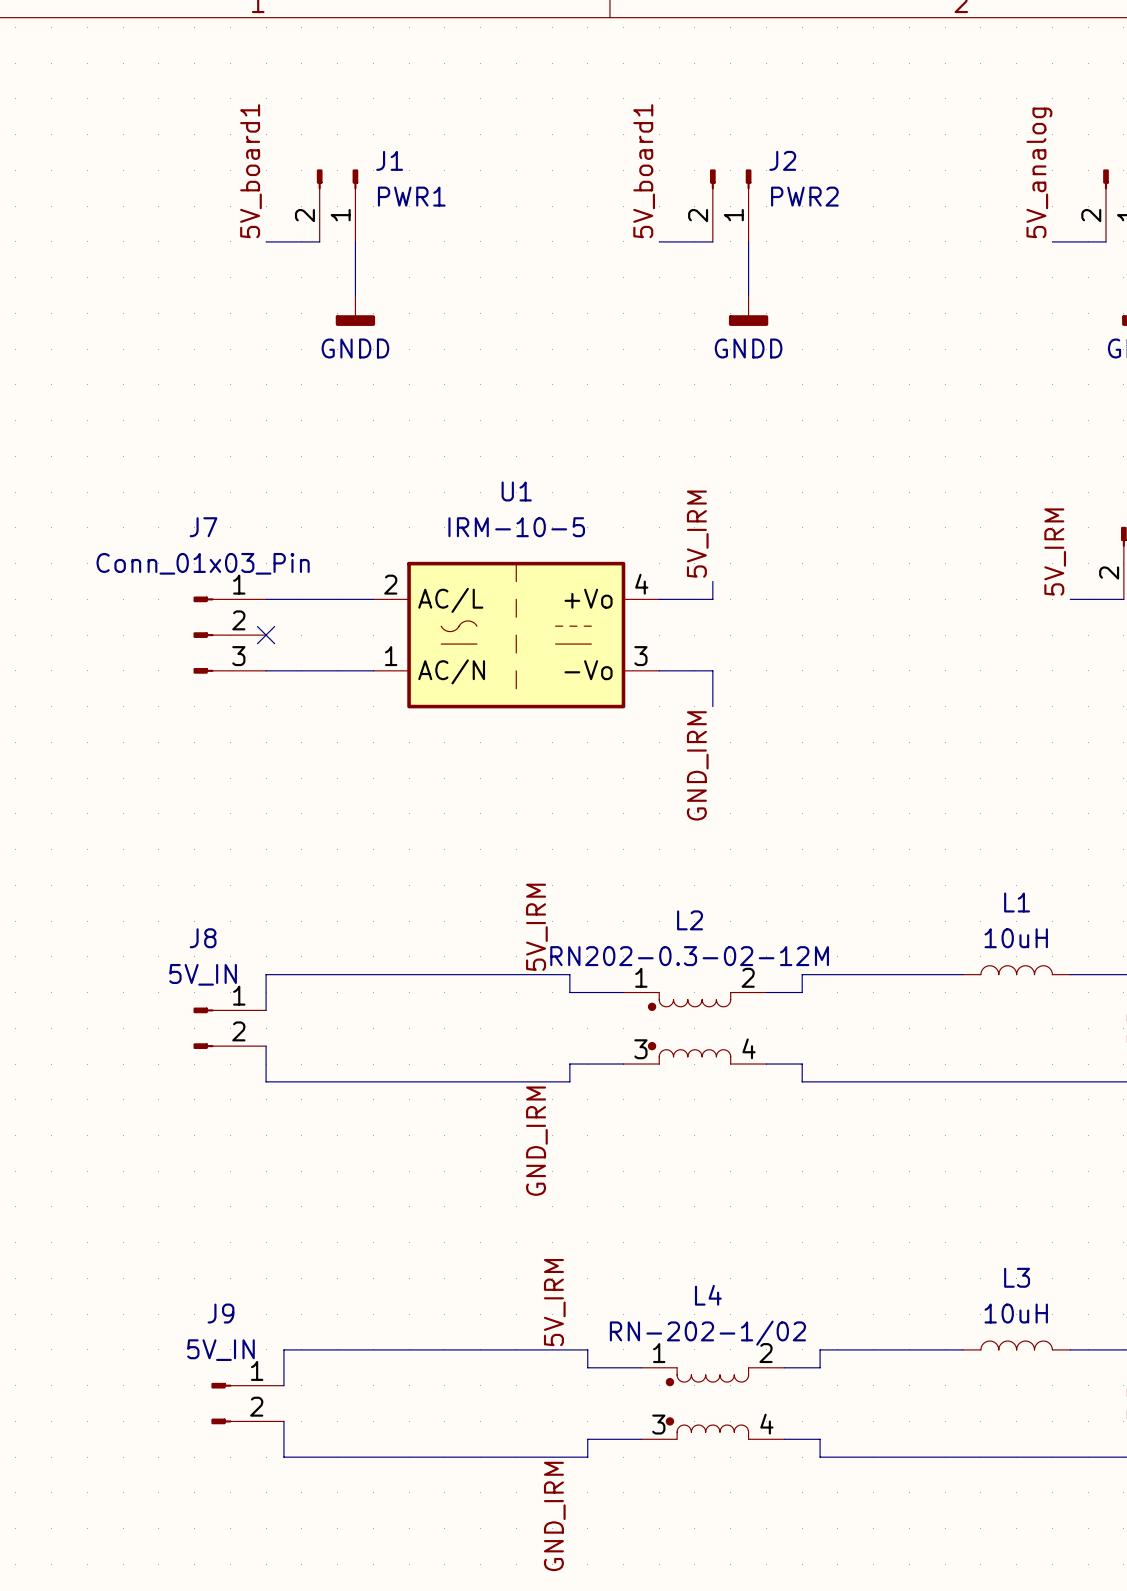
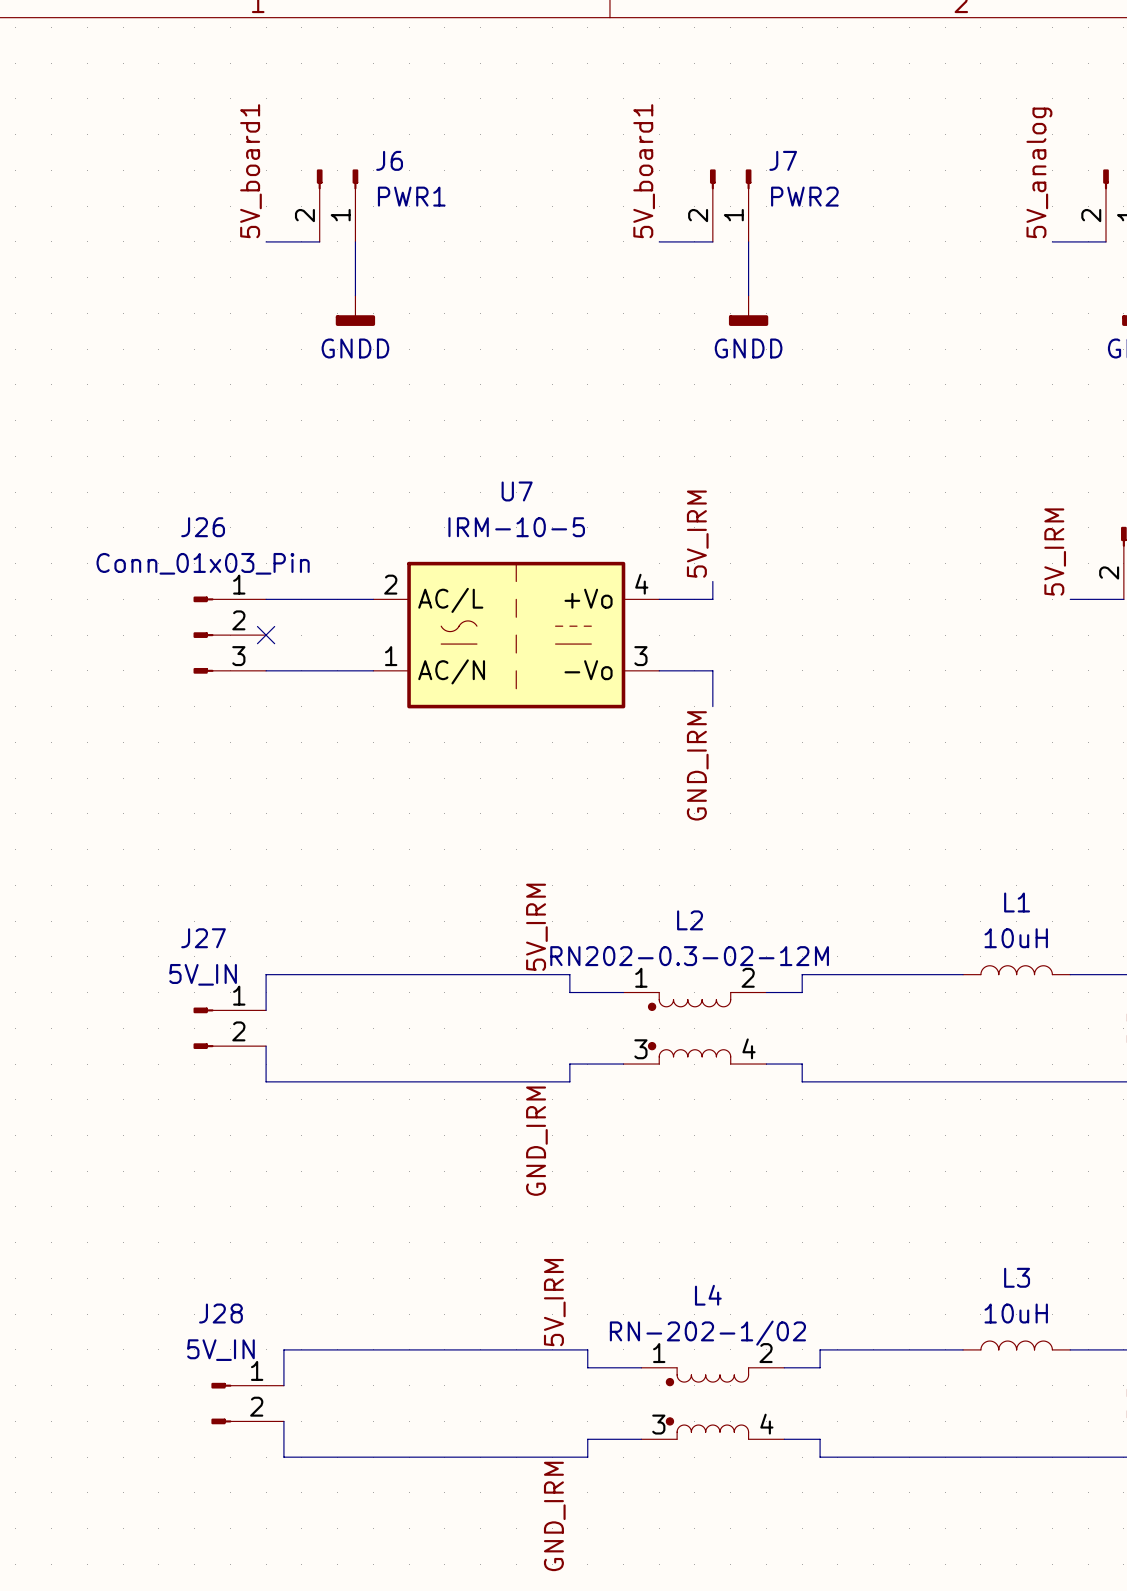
J1 name: J1 (389, 160) -> J6 (389, 160)
J2 name: J2 (782, 160) -> J7 (783, 160)
U1 name: U1 (516, 491) -> U7 (517, 491)
J7 name: J7 (203, 527) -> J26 (203, 527)
J8 name: J8 (203, 938) -> J27 (203, 938)
J9 name: J9 (220, 1313) -> J28 (220, 1313)

